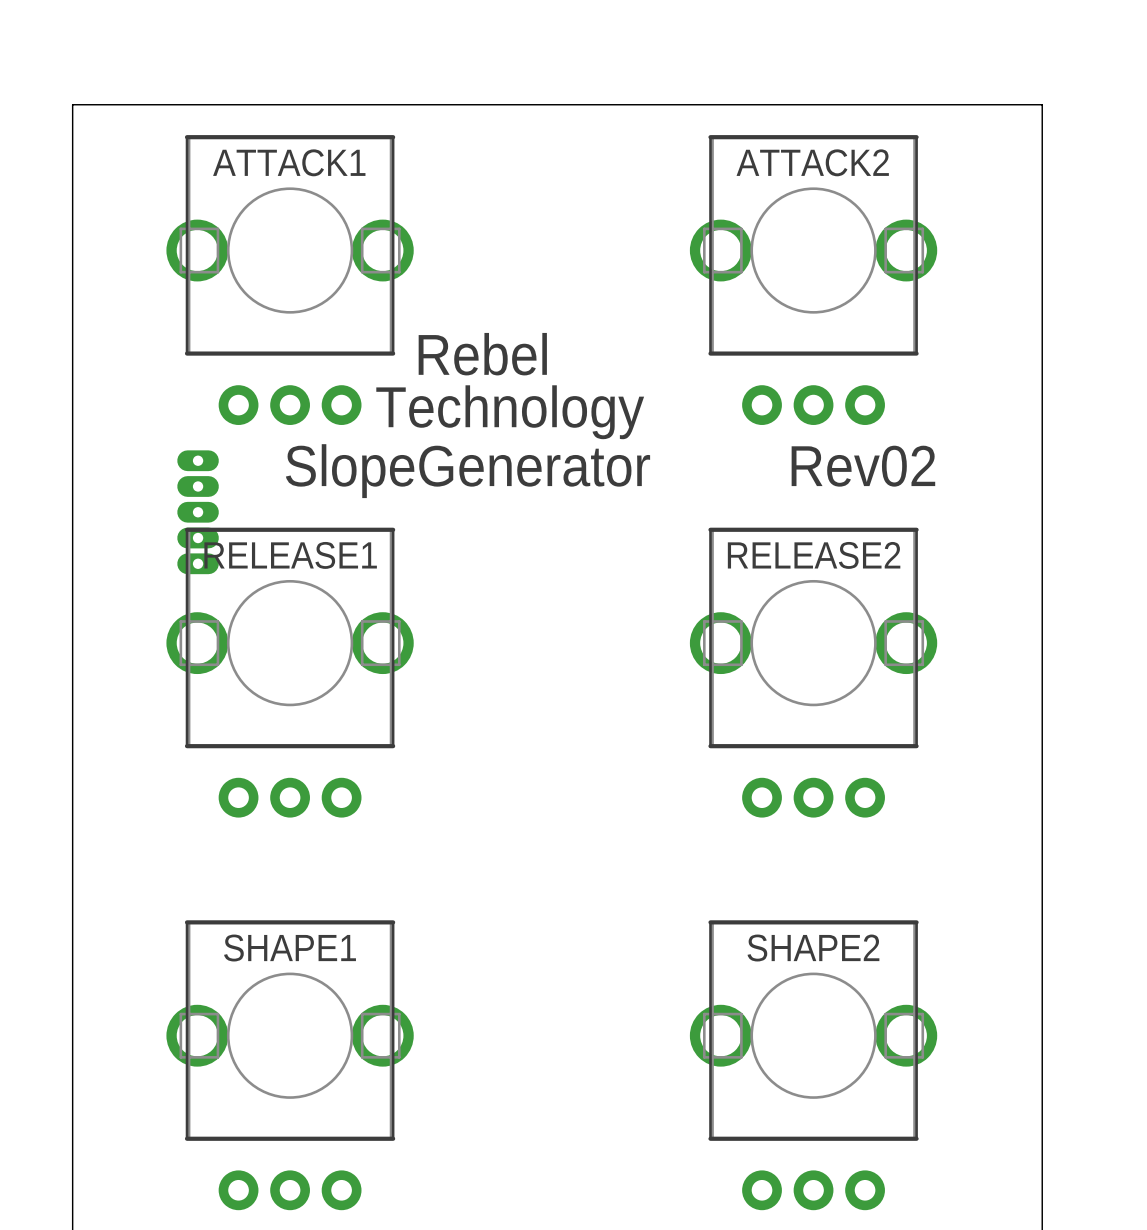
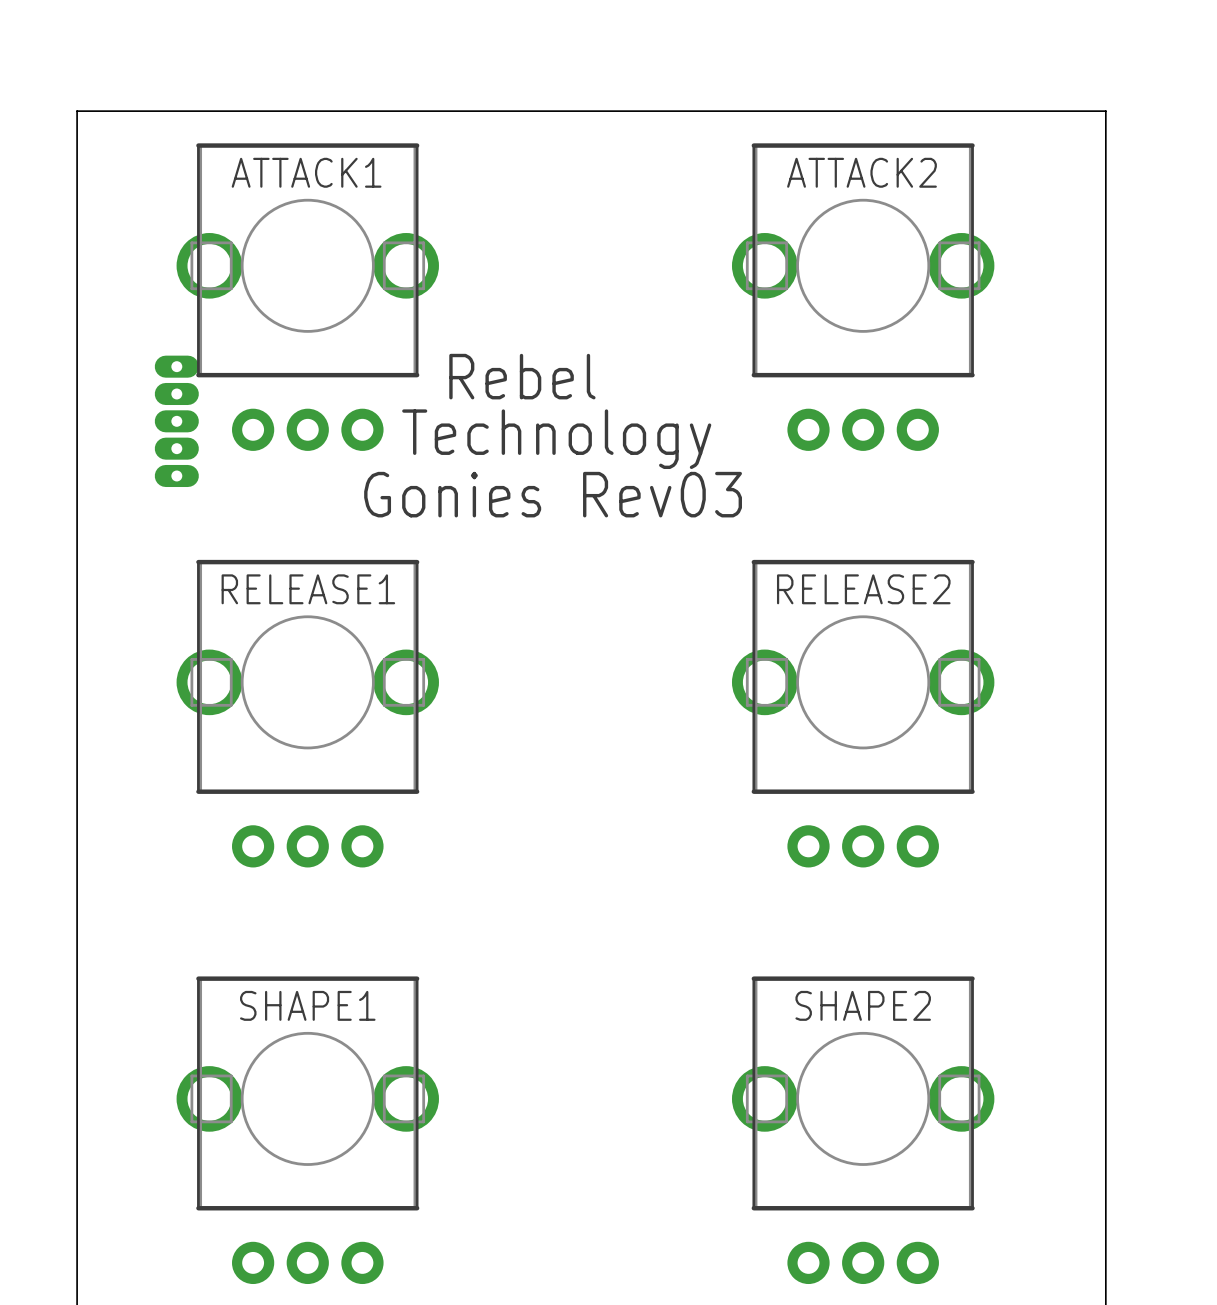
text: none -> Gonies Rev03 (553, 494)
text: Rev02 (863, 466) -> none
text: SlopeGenerator (468, 471) -> none
part position: (198, 512) -> (176, 421)

